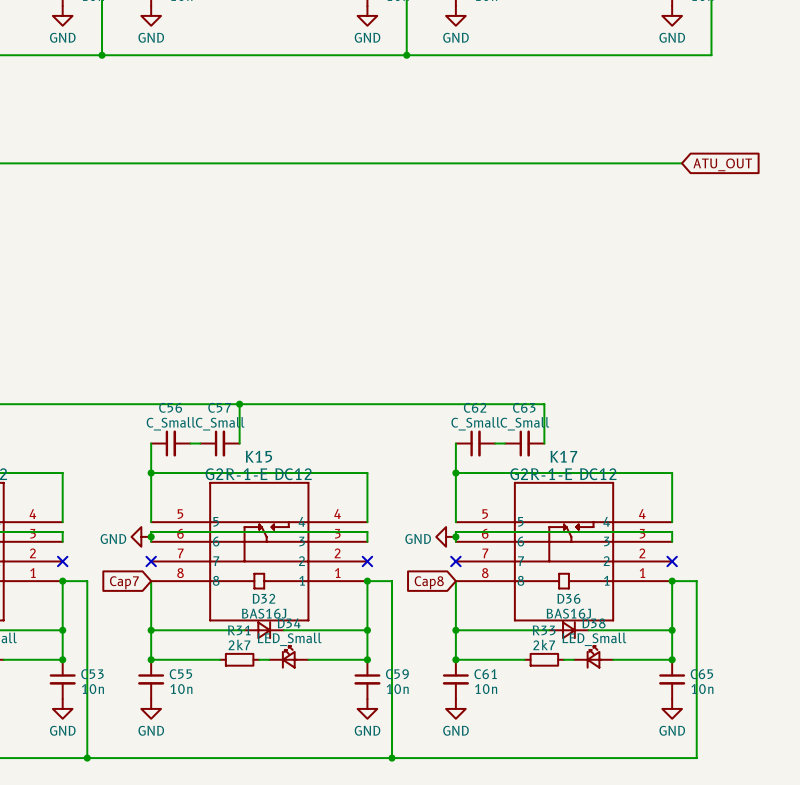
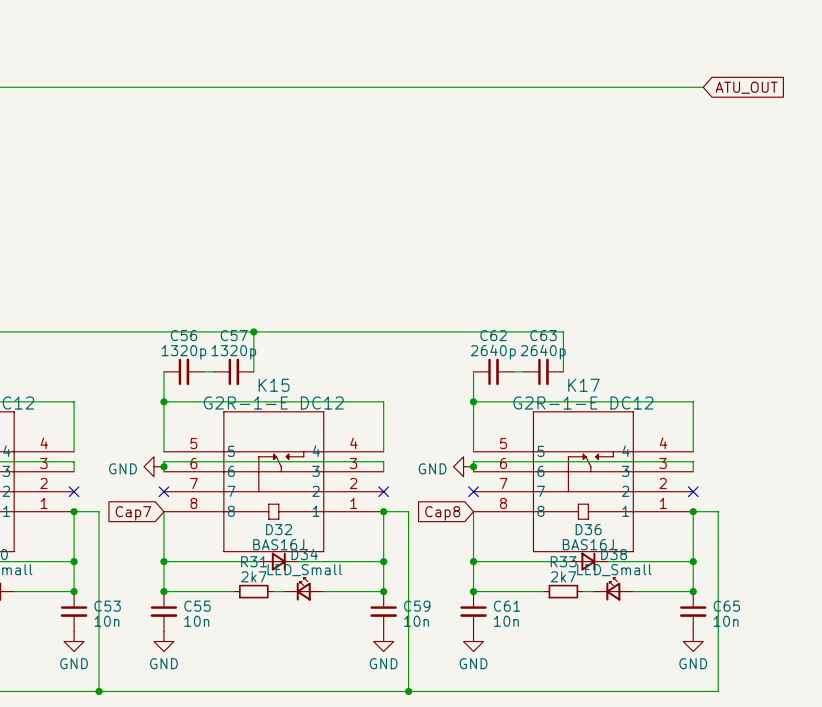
C56 value: C_Small (171, 423) -> 1320p (183, 352)
C57 value: C_Small (220, 423) -> 1320p (233, 352)
C62 value: C_Small (475, 423) -> 2640p (493, 352)
C63 value: C_Small (524, 423) -> 2640p (543, 352)

